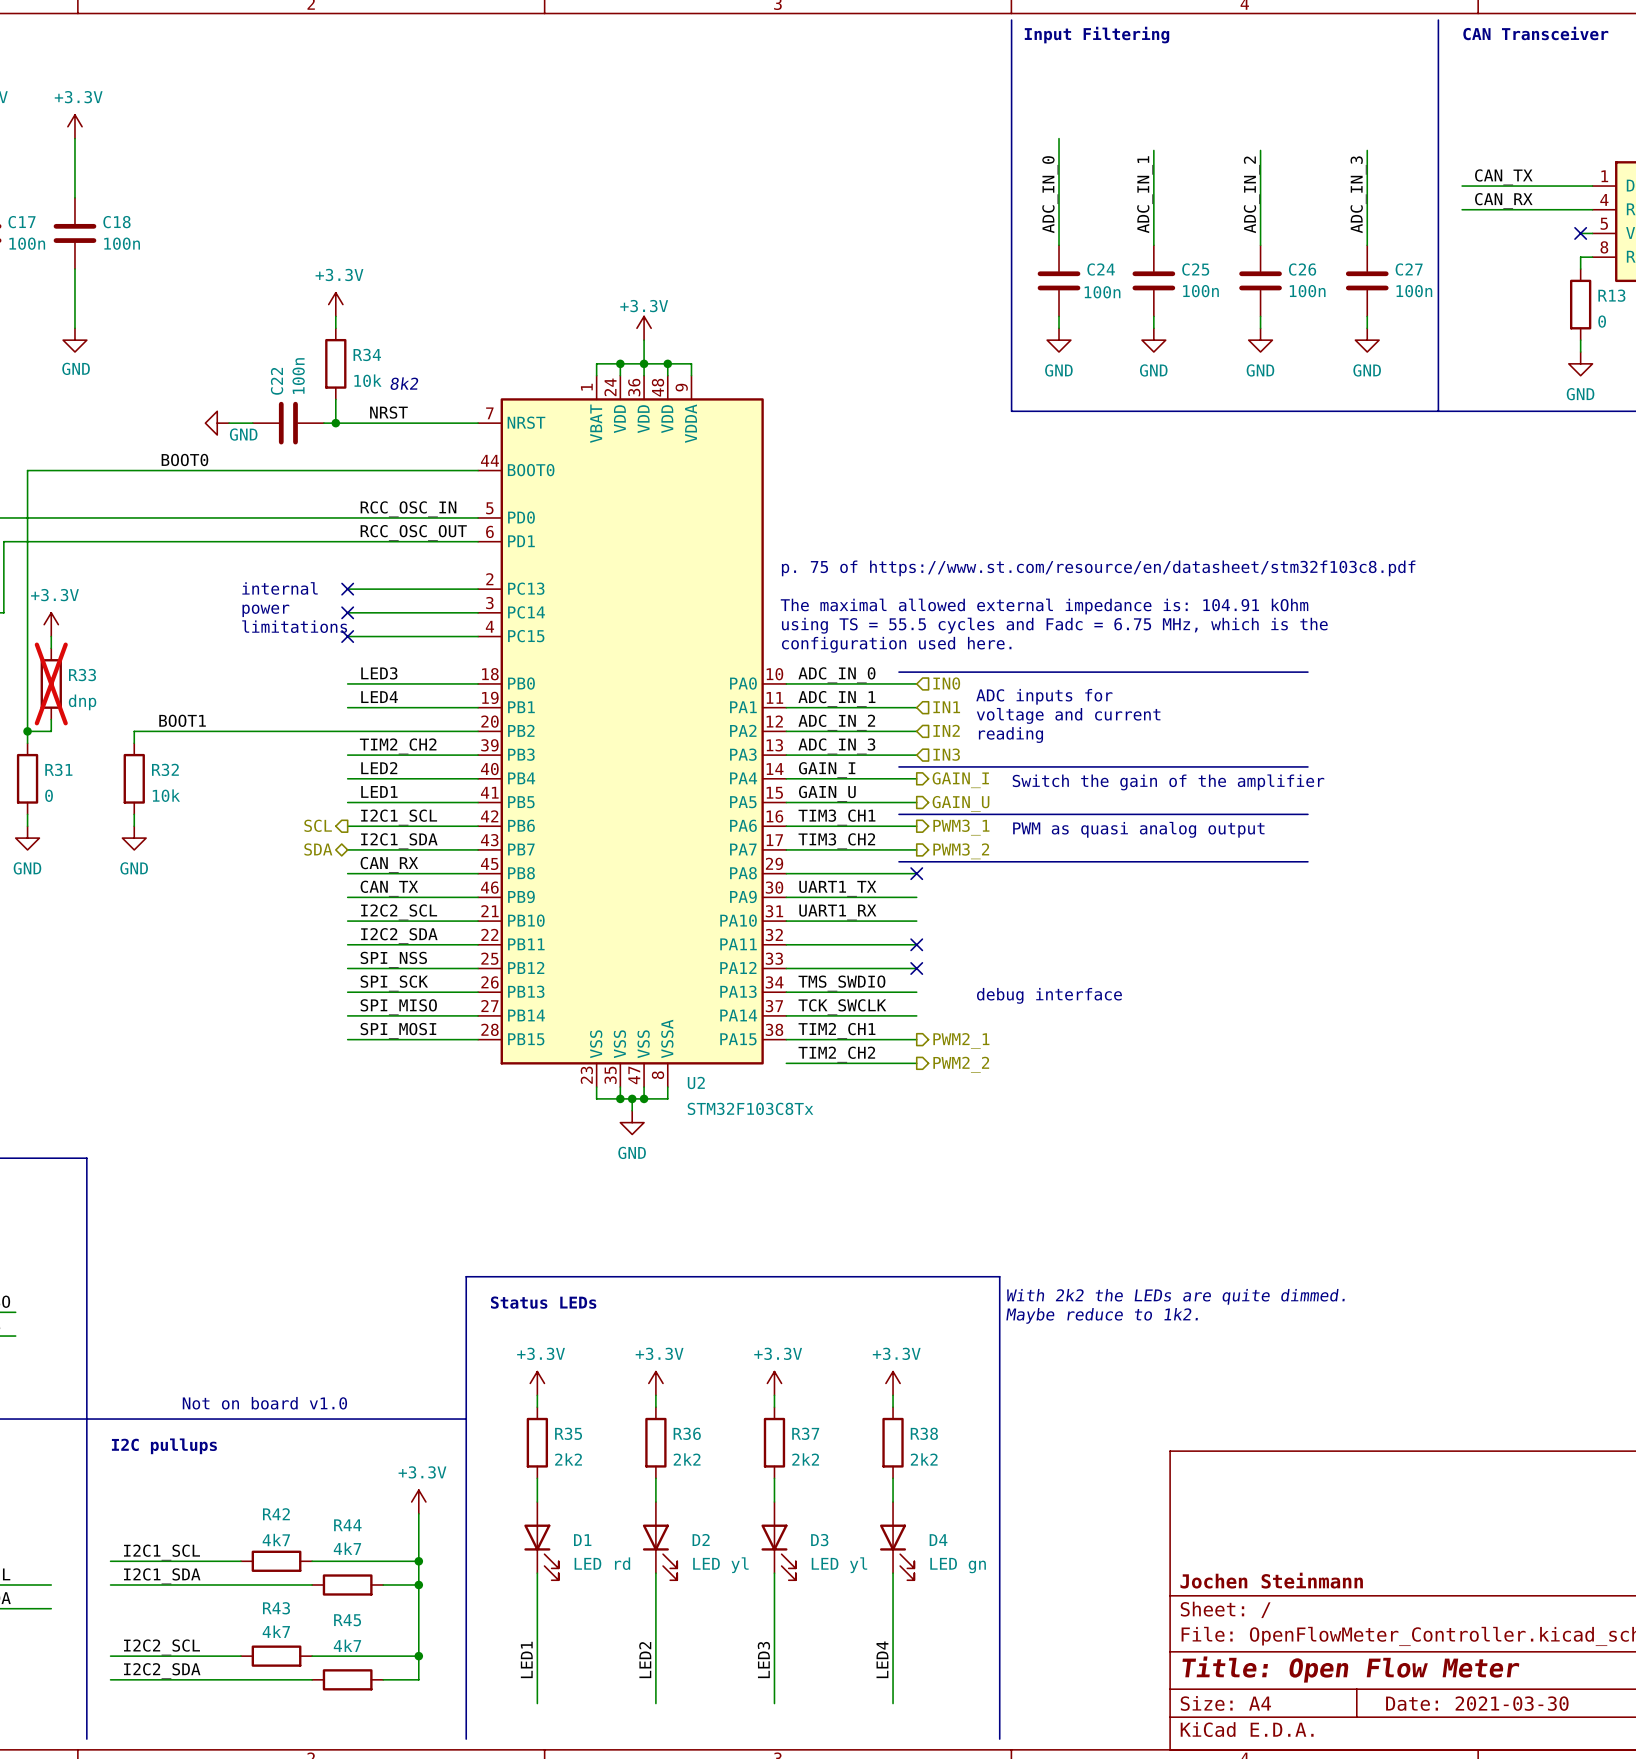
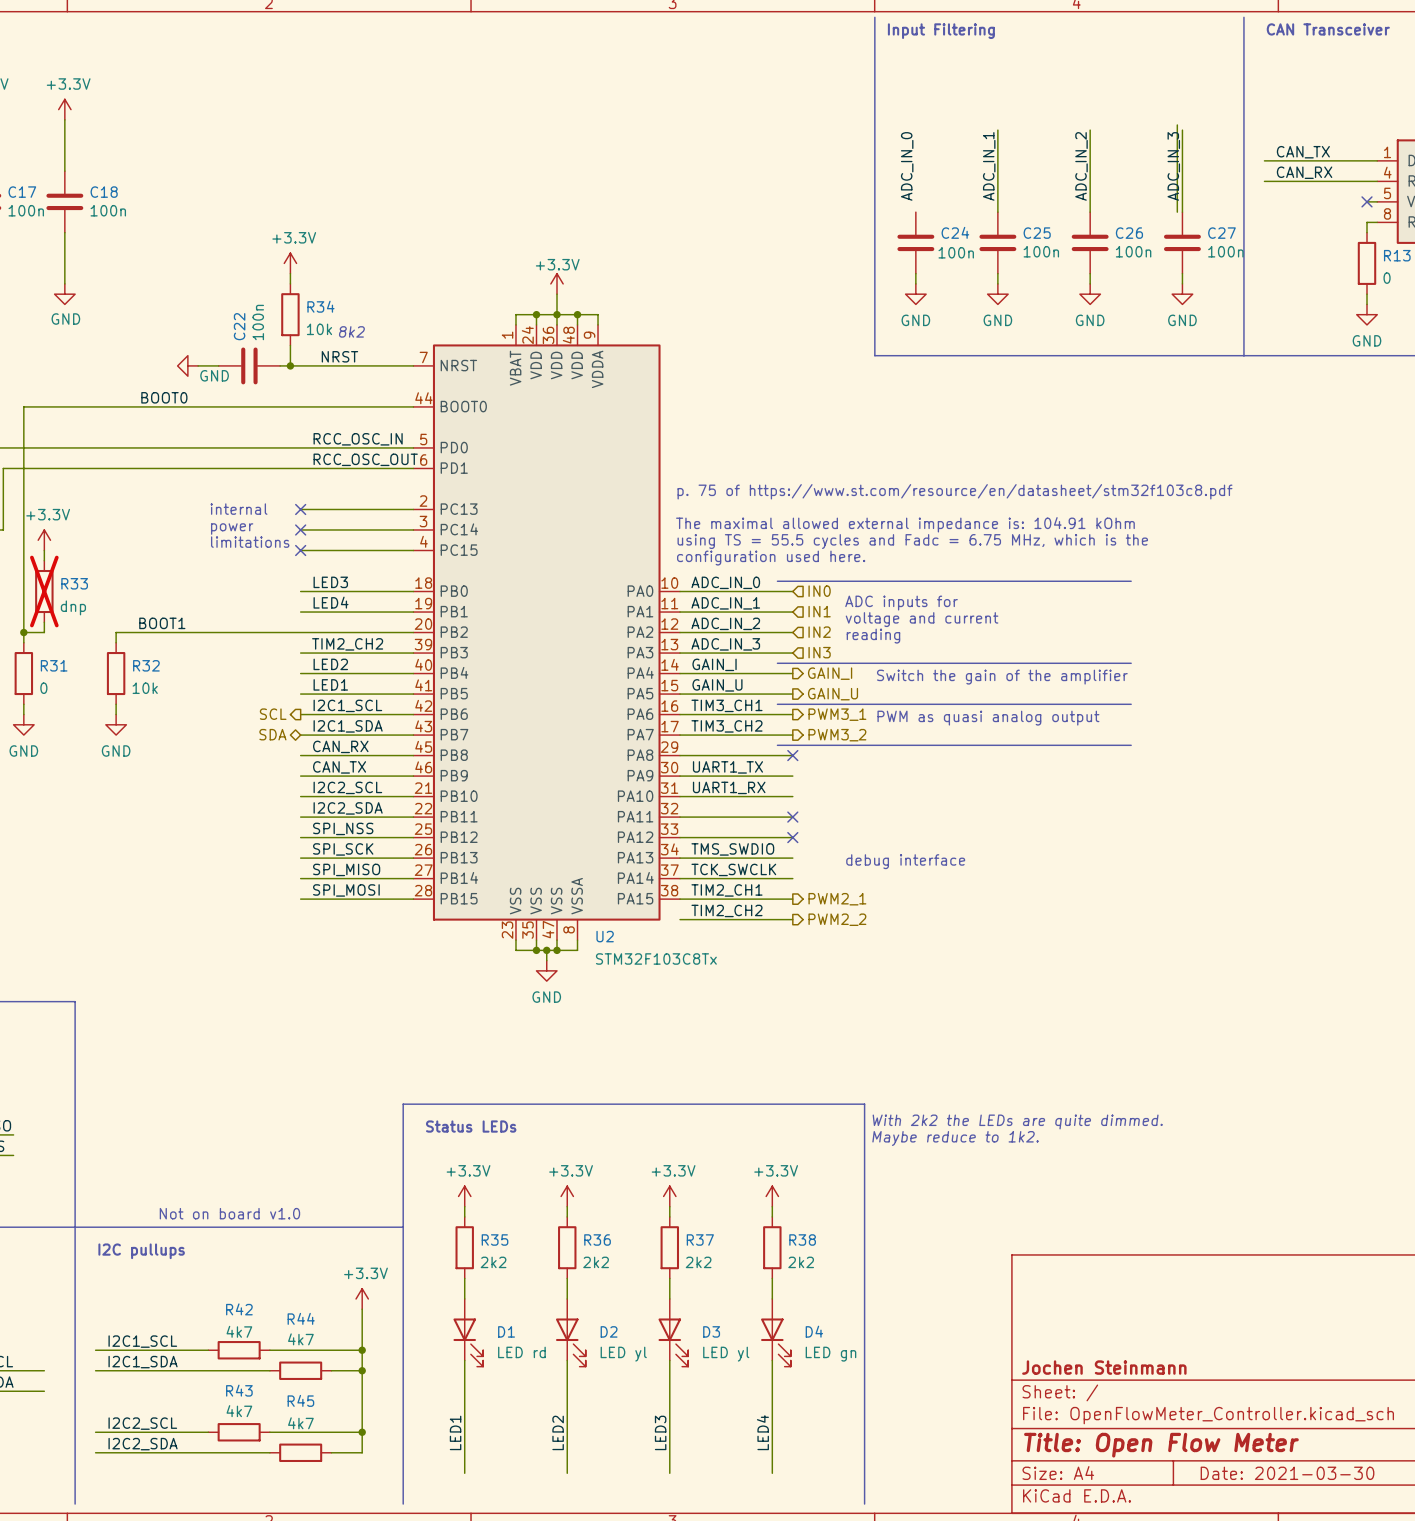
wire: (1059, 138) (1059, 245) -> none
wire: none -> (1177, 124) (1177, 212)

